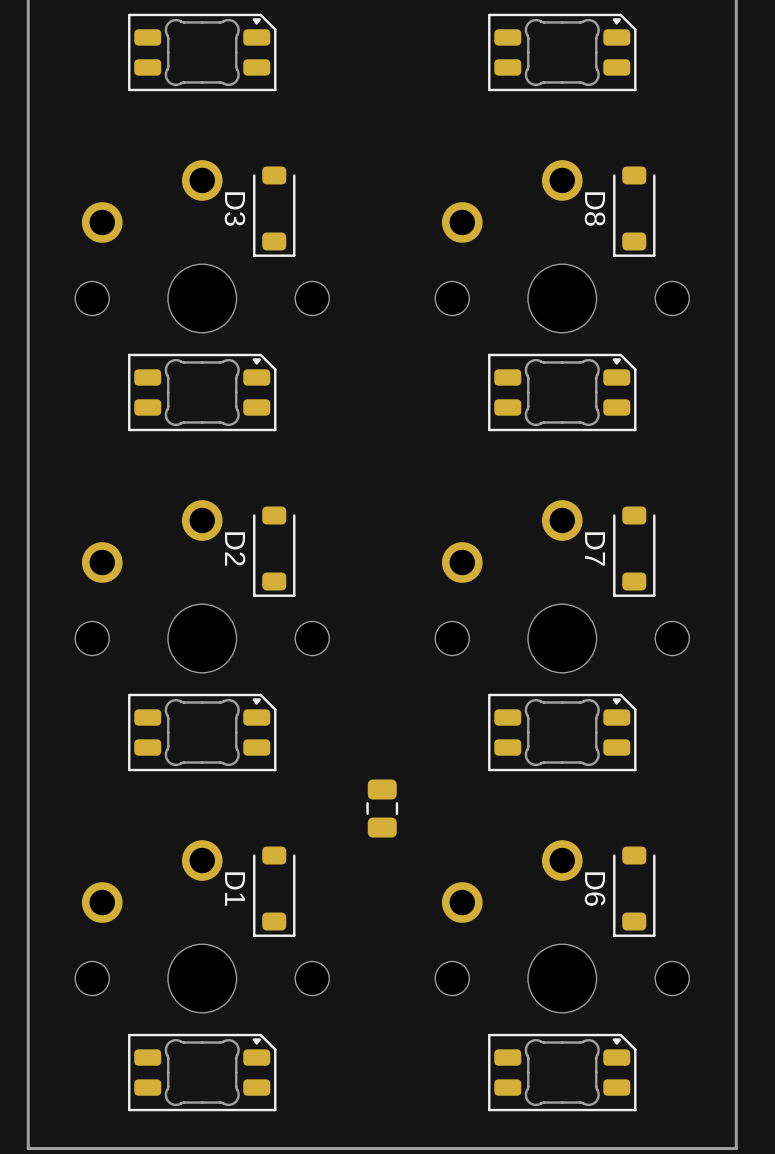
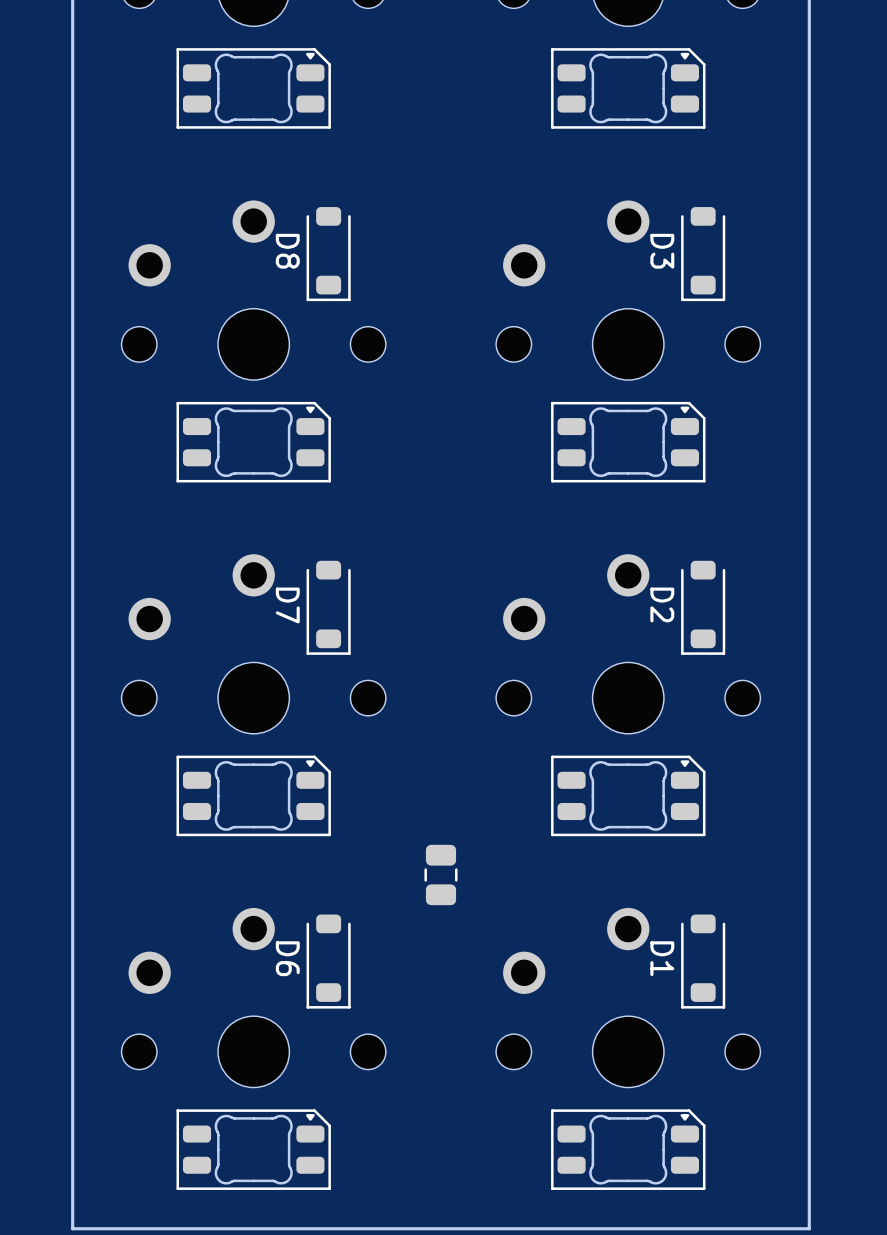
D3 name: D3 (235, 209) -> D8 (287, 251)
D8 name: D8 (595, 209) -> D3 (662, 251)
D2 name: D2 (235, 548) -> D7 (287, 605)
D7 name: D7 (595, 548) -> D2 (662, 604)
D1 name: D1 (235, 889) -> D6 (287, 958)
D6 name: D6 (595, 889) -> D1 (662, 958)

